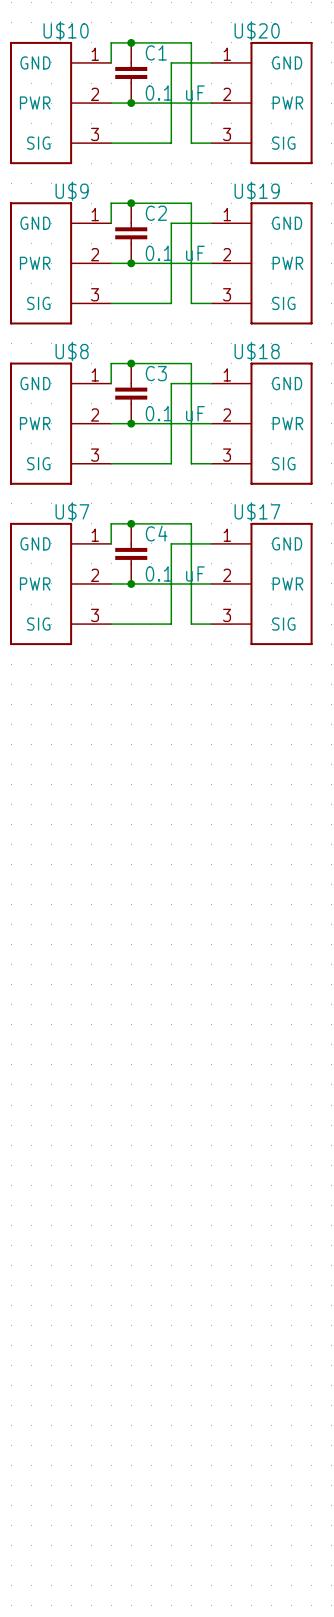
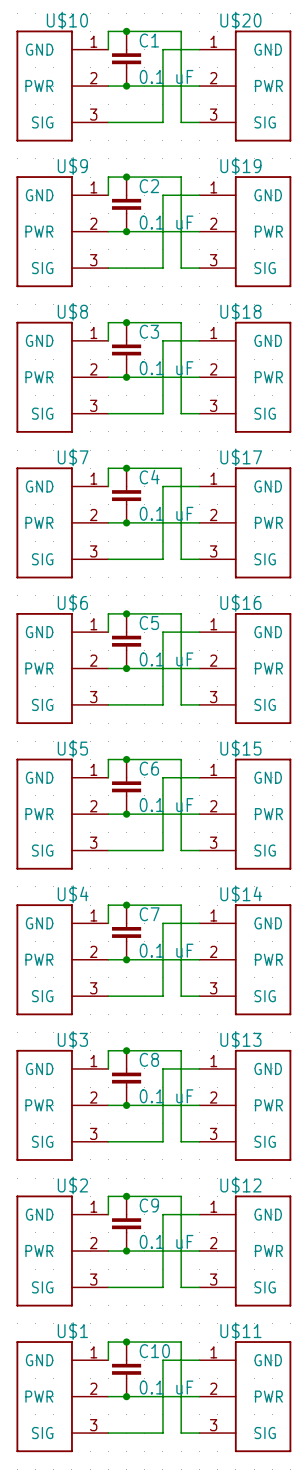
junction: none -> (126, 613)
wire: none -> (108, 632) (108, 613) (181, 613) (181, 704) (199, 704)
wire: none -> (199, 632) (162, 632) (162, 704) (108, 704)
C5: none -> 0.1 uF (126, 641)
U$6: none -> (62, 668)
wire: none -> (108, 668) (199, 668)
junction: none -> (126, 668)
U$16: none -> (245, 668)
junction: none -> (126, 759)
wire: none -> (108, 777) (108, 759) (181, 759) (181, 850) (199, 850)
wire: none -> (199, 777) (162, 777) (162, 850) (108, 850)
C6: none -> 0.1 uF (126, 786)
U$5: none -> (62, 814)
wire: none -> (108, 814) (199, 814)
junction: none -> (126, 814)
U$15: none -> (245, 814)
junction: none -> (126, 905)
wire: none -> (108, 923) (108, 905) (181, 905) (181, 996) (199, 996)
wire: none -> (199, 923) (162, 923) (162, 996) (108, 996)
C7: none -> 0.1 uF (126, 932)
U$4: none -> (62, 959)
wire: none -> (108, 959) (199, 959)
junction: none -> (126, 959)
U$14: none -> (245, 959)
junction: none -> (126, 1050)
wire: none -> (108, 1068) (108, 1050) (181, 1050) (181, 1141) (199, 1141)
wire: none -> (199, 1068) (162, 1068) (162, 1141) (108, 1141)
C8: none -> 0.1 uF (126, 1078)
U$3: none -> (62, 1105)
wire: none -> (108, 1105) (199, 1105)
junction: none -> (126, 1105)
U$13: none -> (245, 1105)
junction: none -> (126, 1196)
wire: none -> (108, 1214) (108, 1196) (181, 1196) (181, 1287) (199, 1287)
wire: none -> (199, 1214) (162, 1214) (162, 1287) (108, 1287)
C9: none -> 0.1 uF (126, 1223)
U$2: none -> (62, 1251)
wire: none -> (108, 1251) (199, 1251)
junction: none -> (126, 1251)
U$12: none -> (245, 1251)
junction: none -> (126, 1342)
wire: none -> (108, 1360) (108, 1342) (181, 1342) (181, 1433) (199, 1433)
wire: none -> (199, 1360) (162, 1360) (162, 1433) (108, 1433)
C10: none -> 0.1 uF (126, 1369)
U$1: none -> (62, 1396)
wire: none -> (108, 1396) (199, 1396)
junction: none -> (126, 1396)
U$11: none -> (245, 1396)

